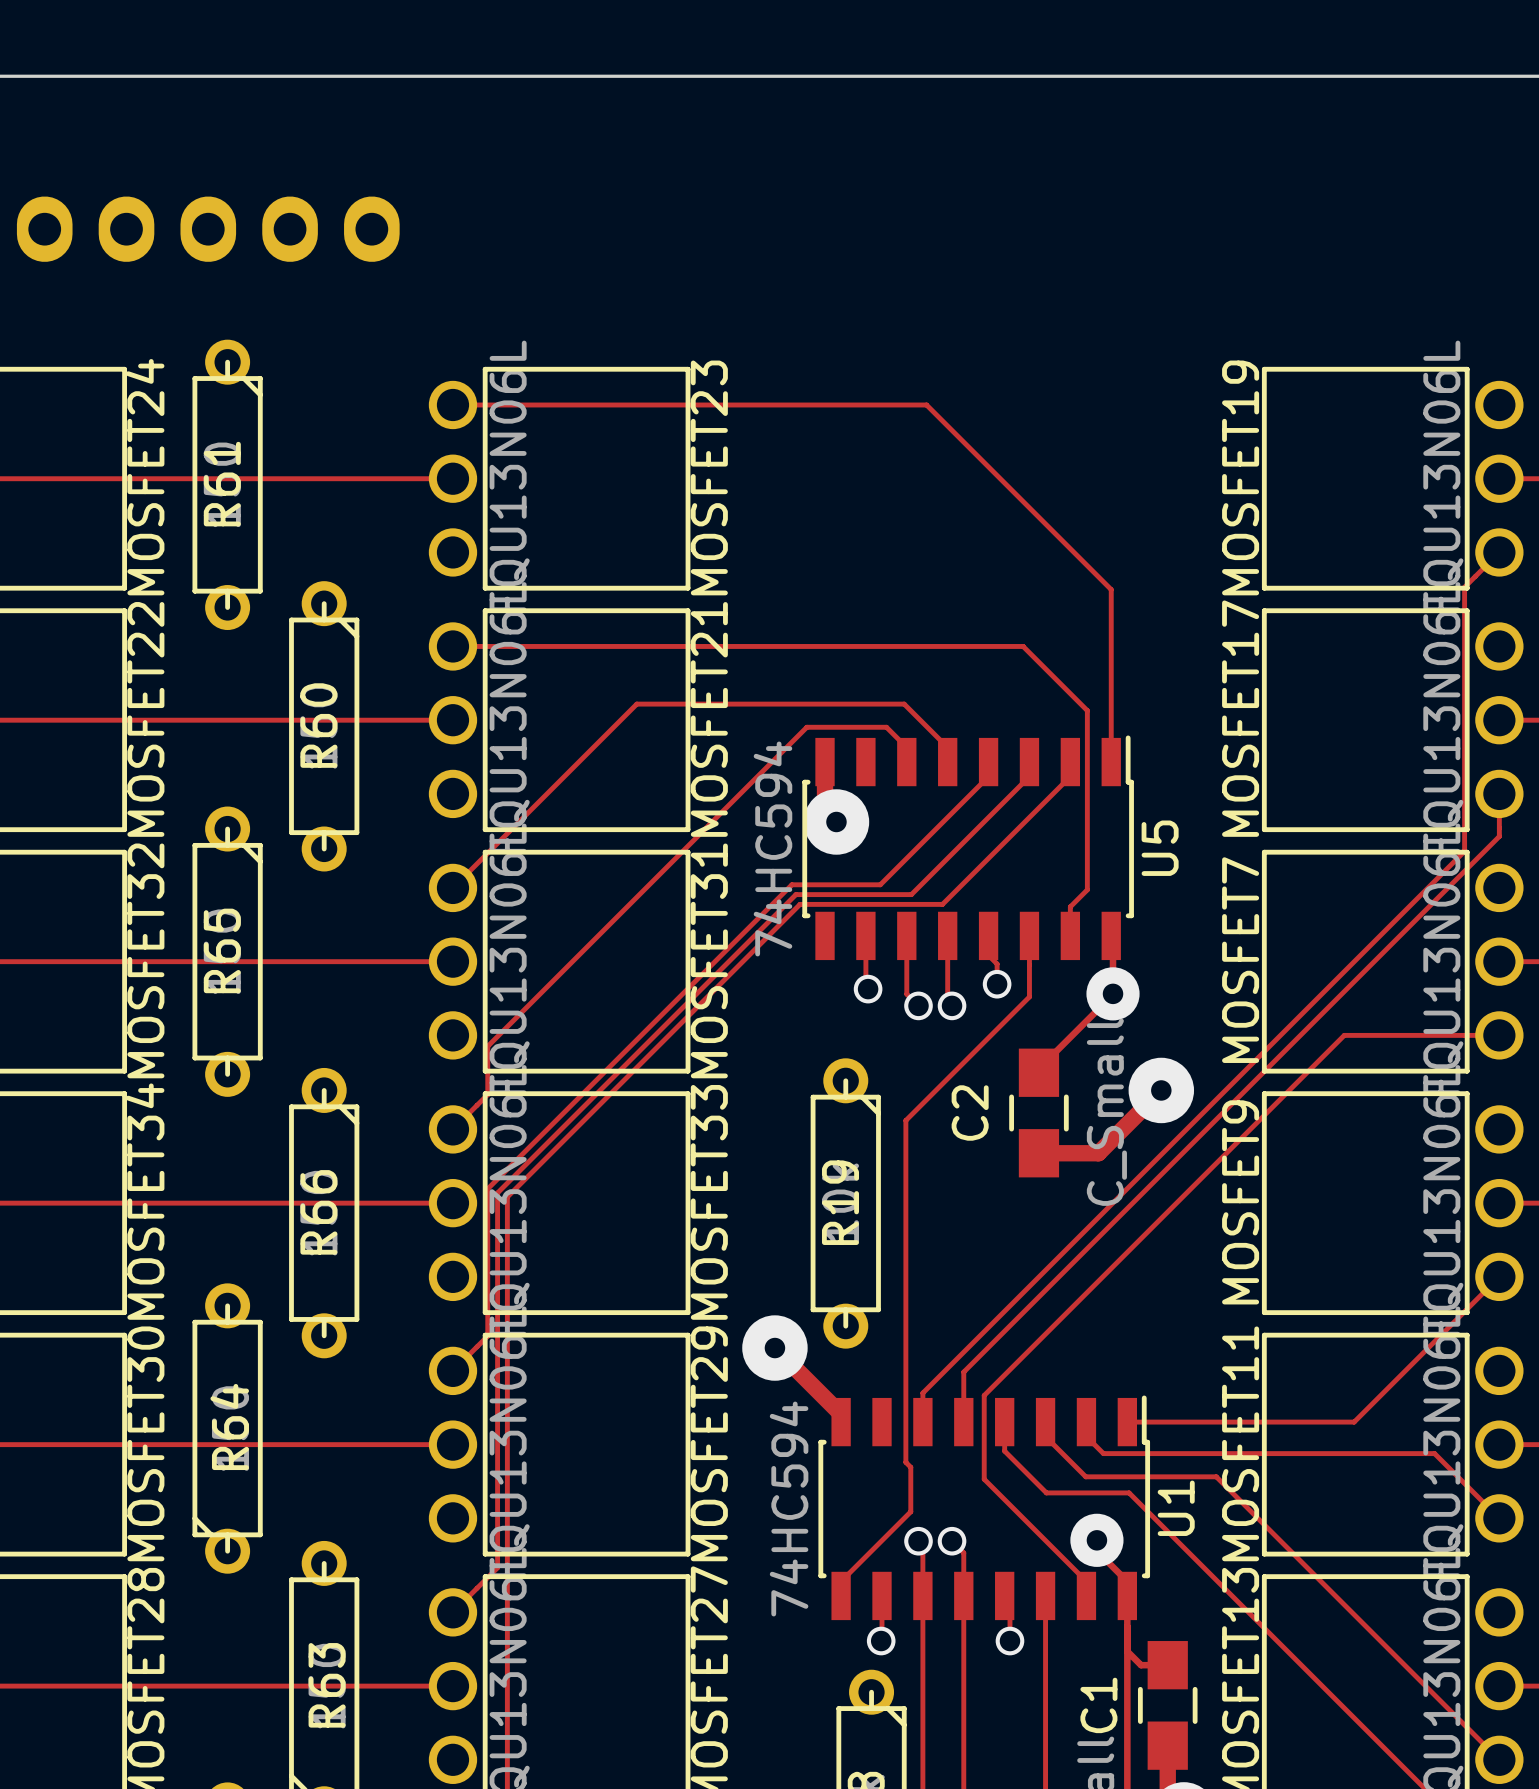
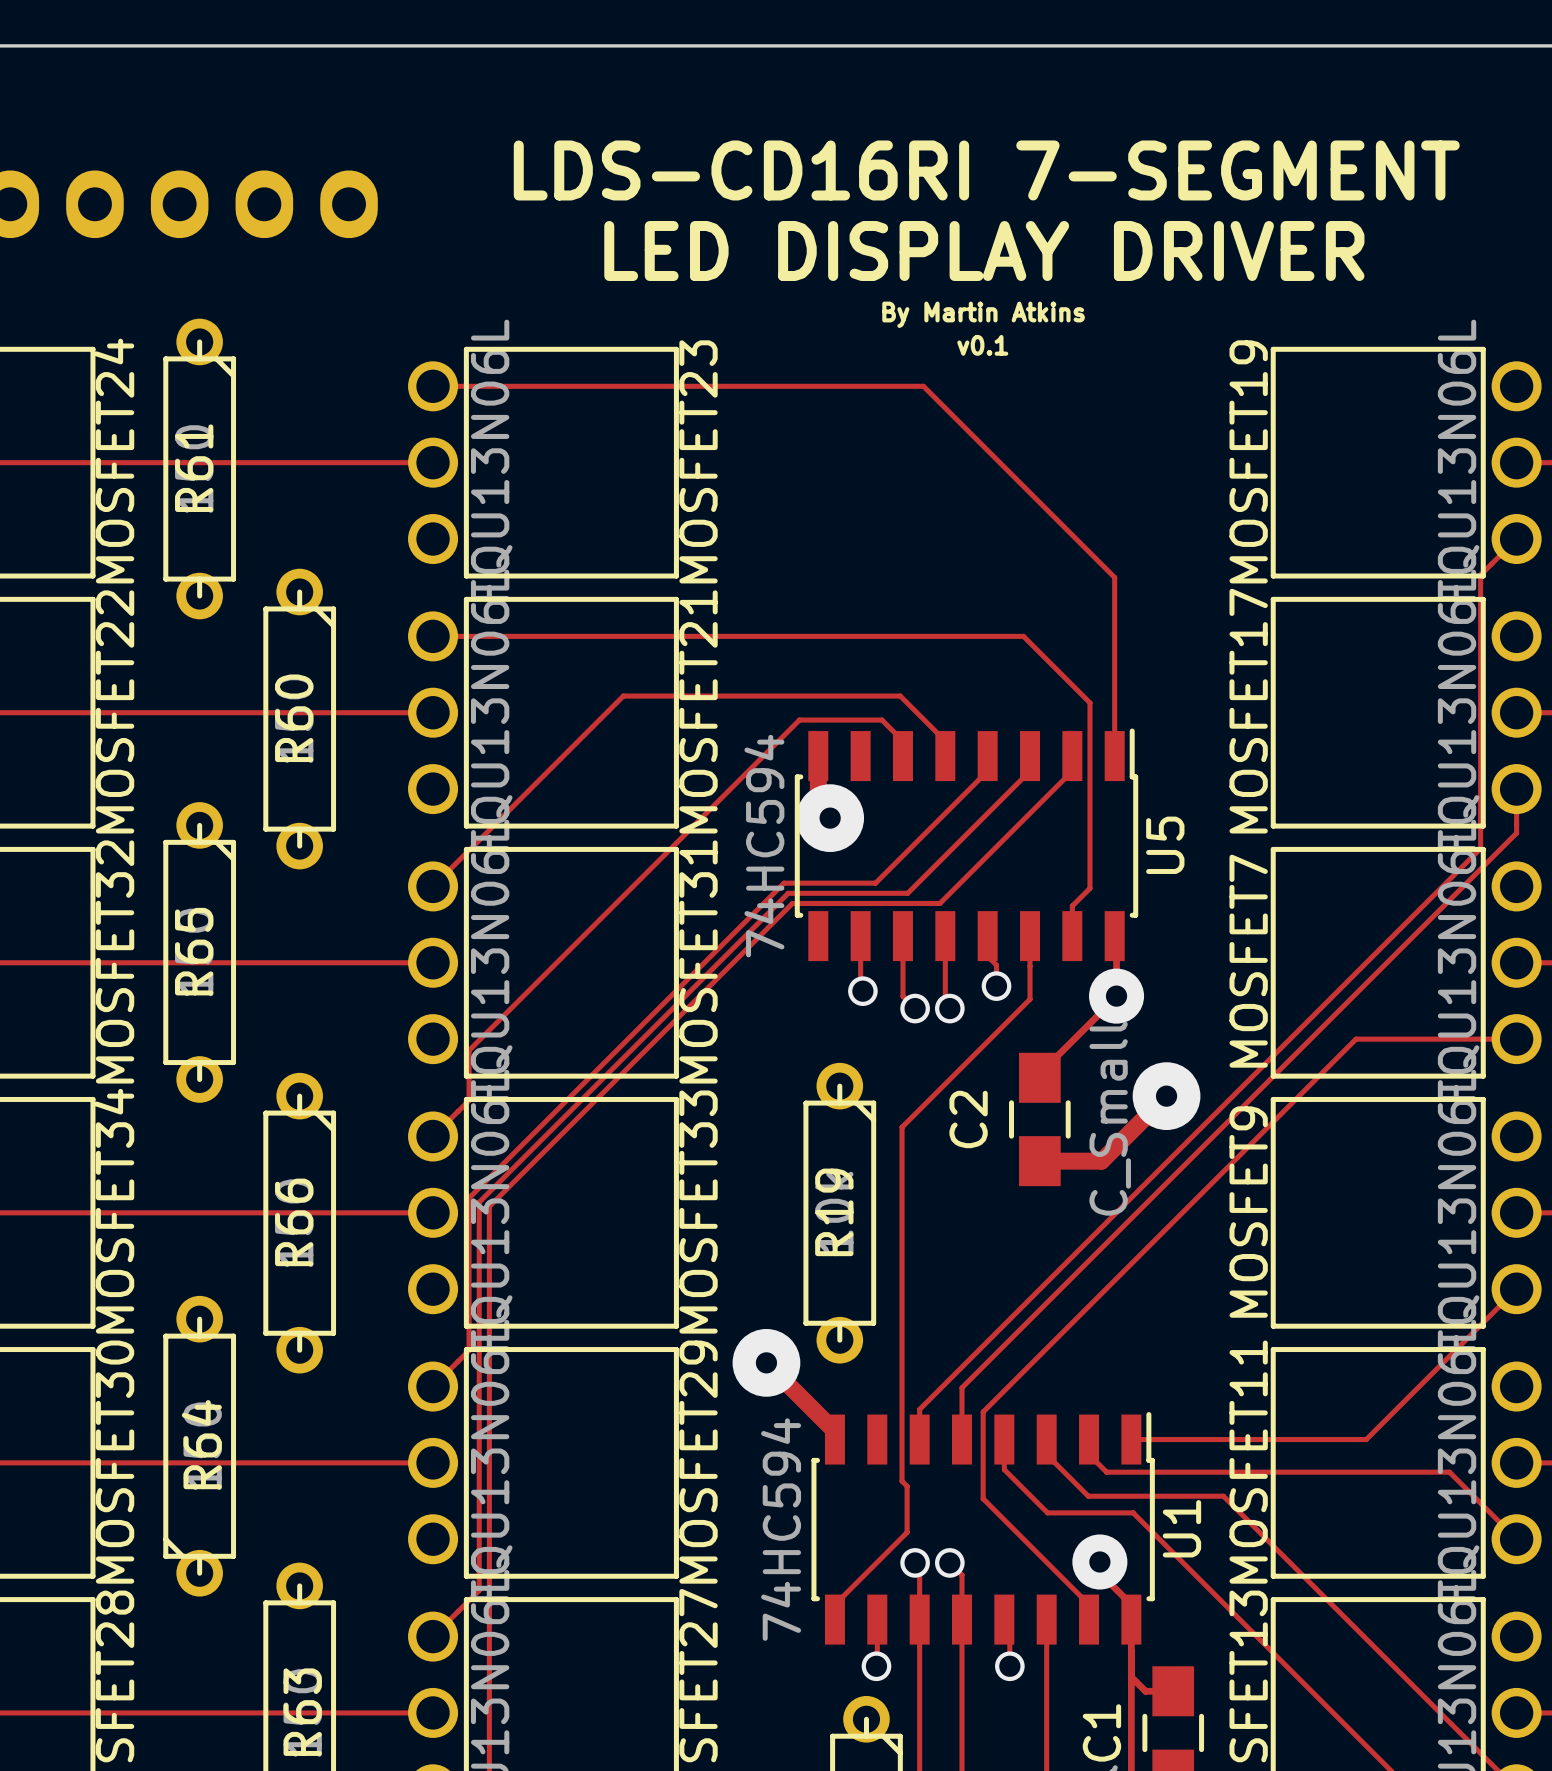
text: none -> LDS-CD16RI 7-SEGMENT (986, 170)
text: none -> LED DISPLAY DRIVER (984, 250)
text: none -> By Martin Atkins (983, 314)
text: none -> v0.1 (982, 345)

